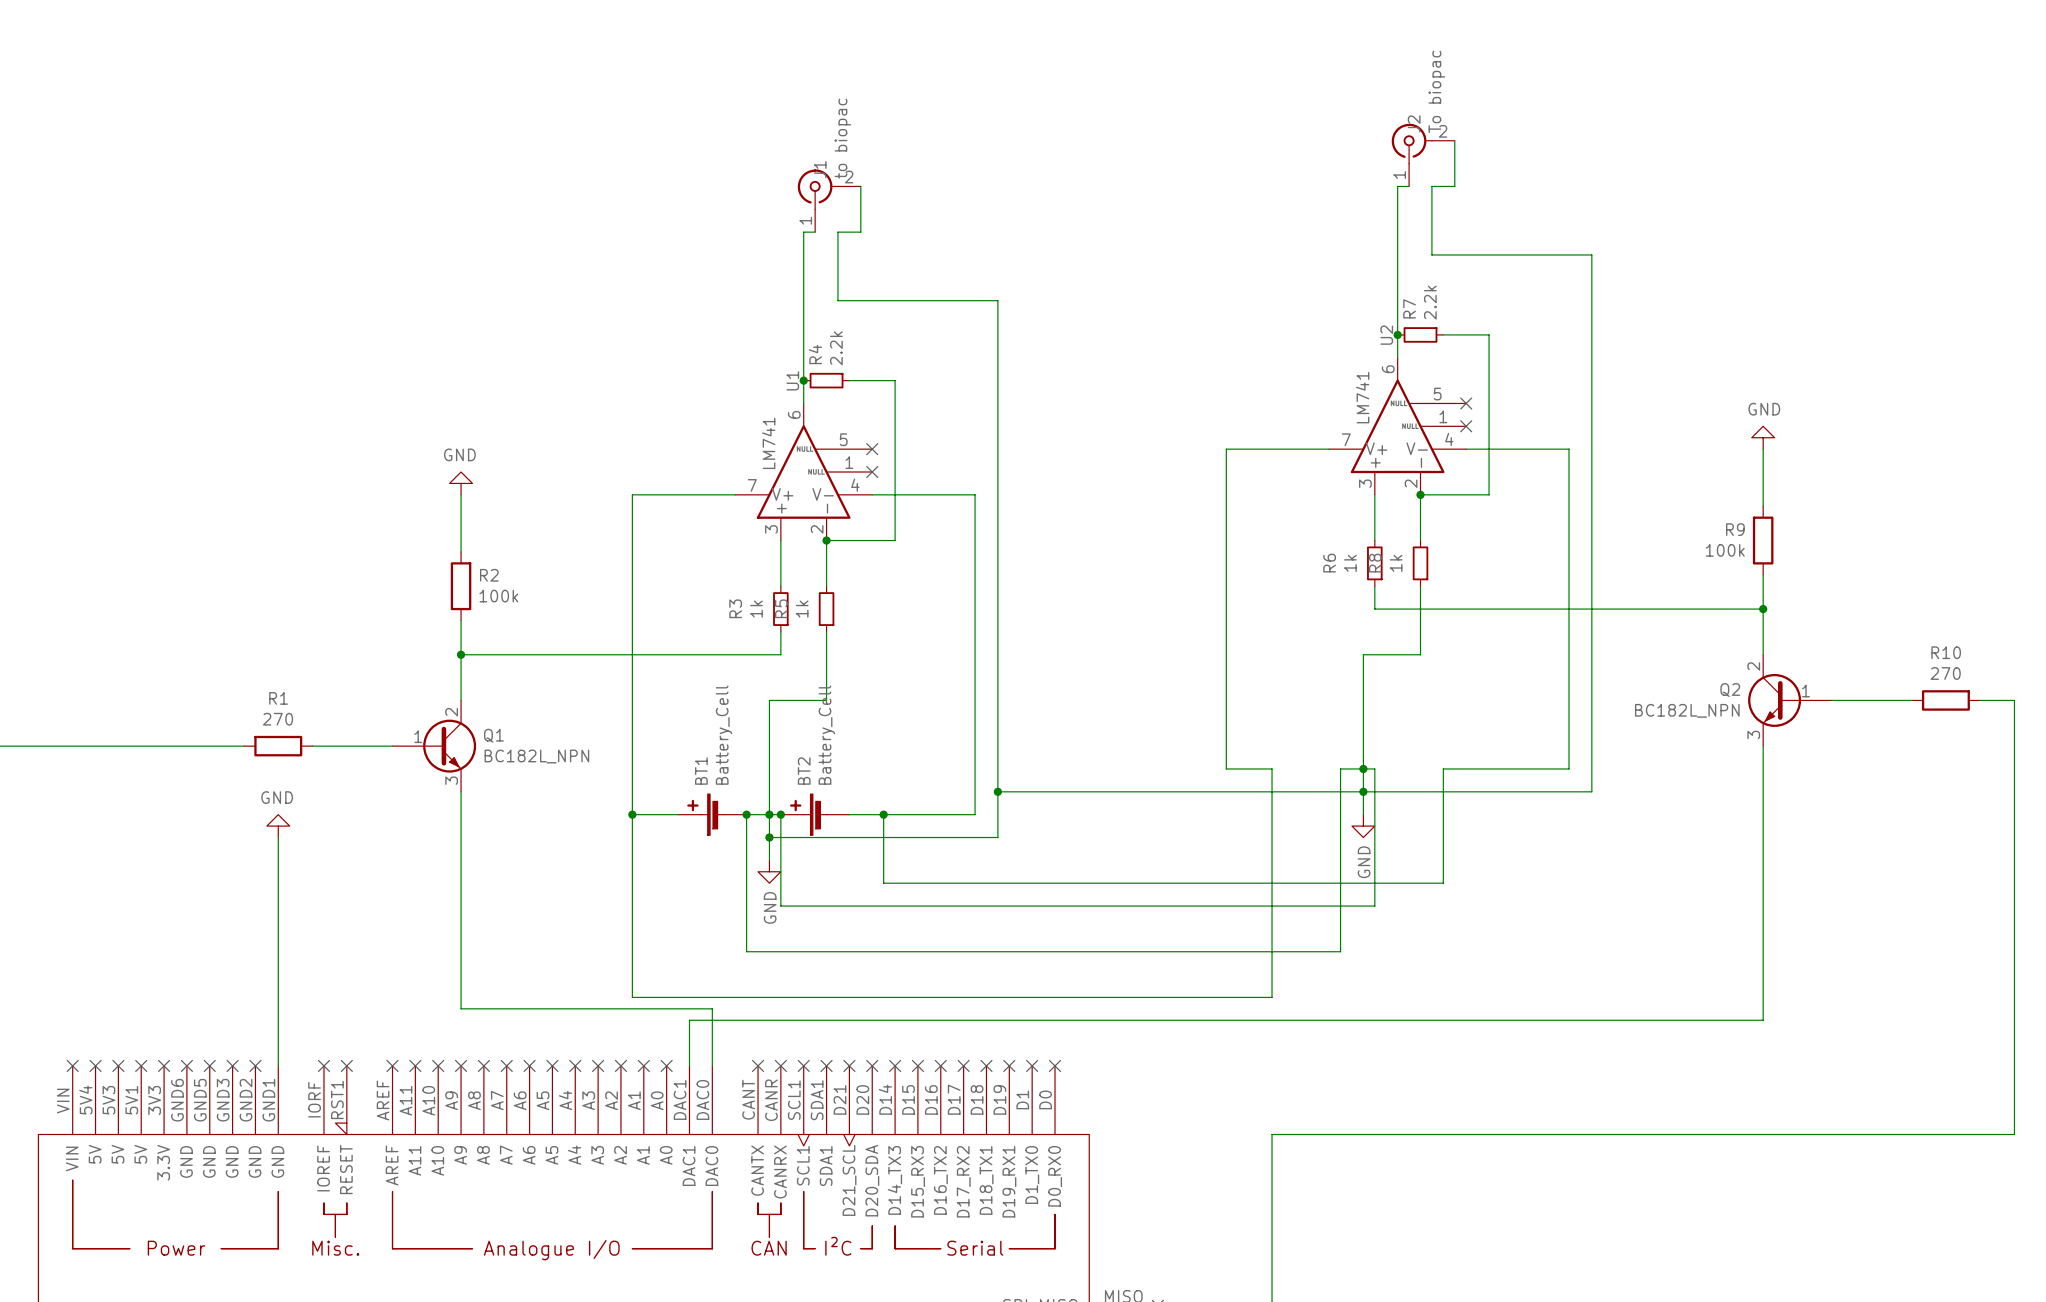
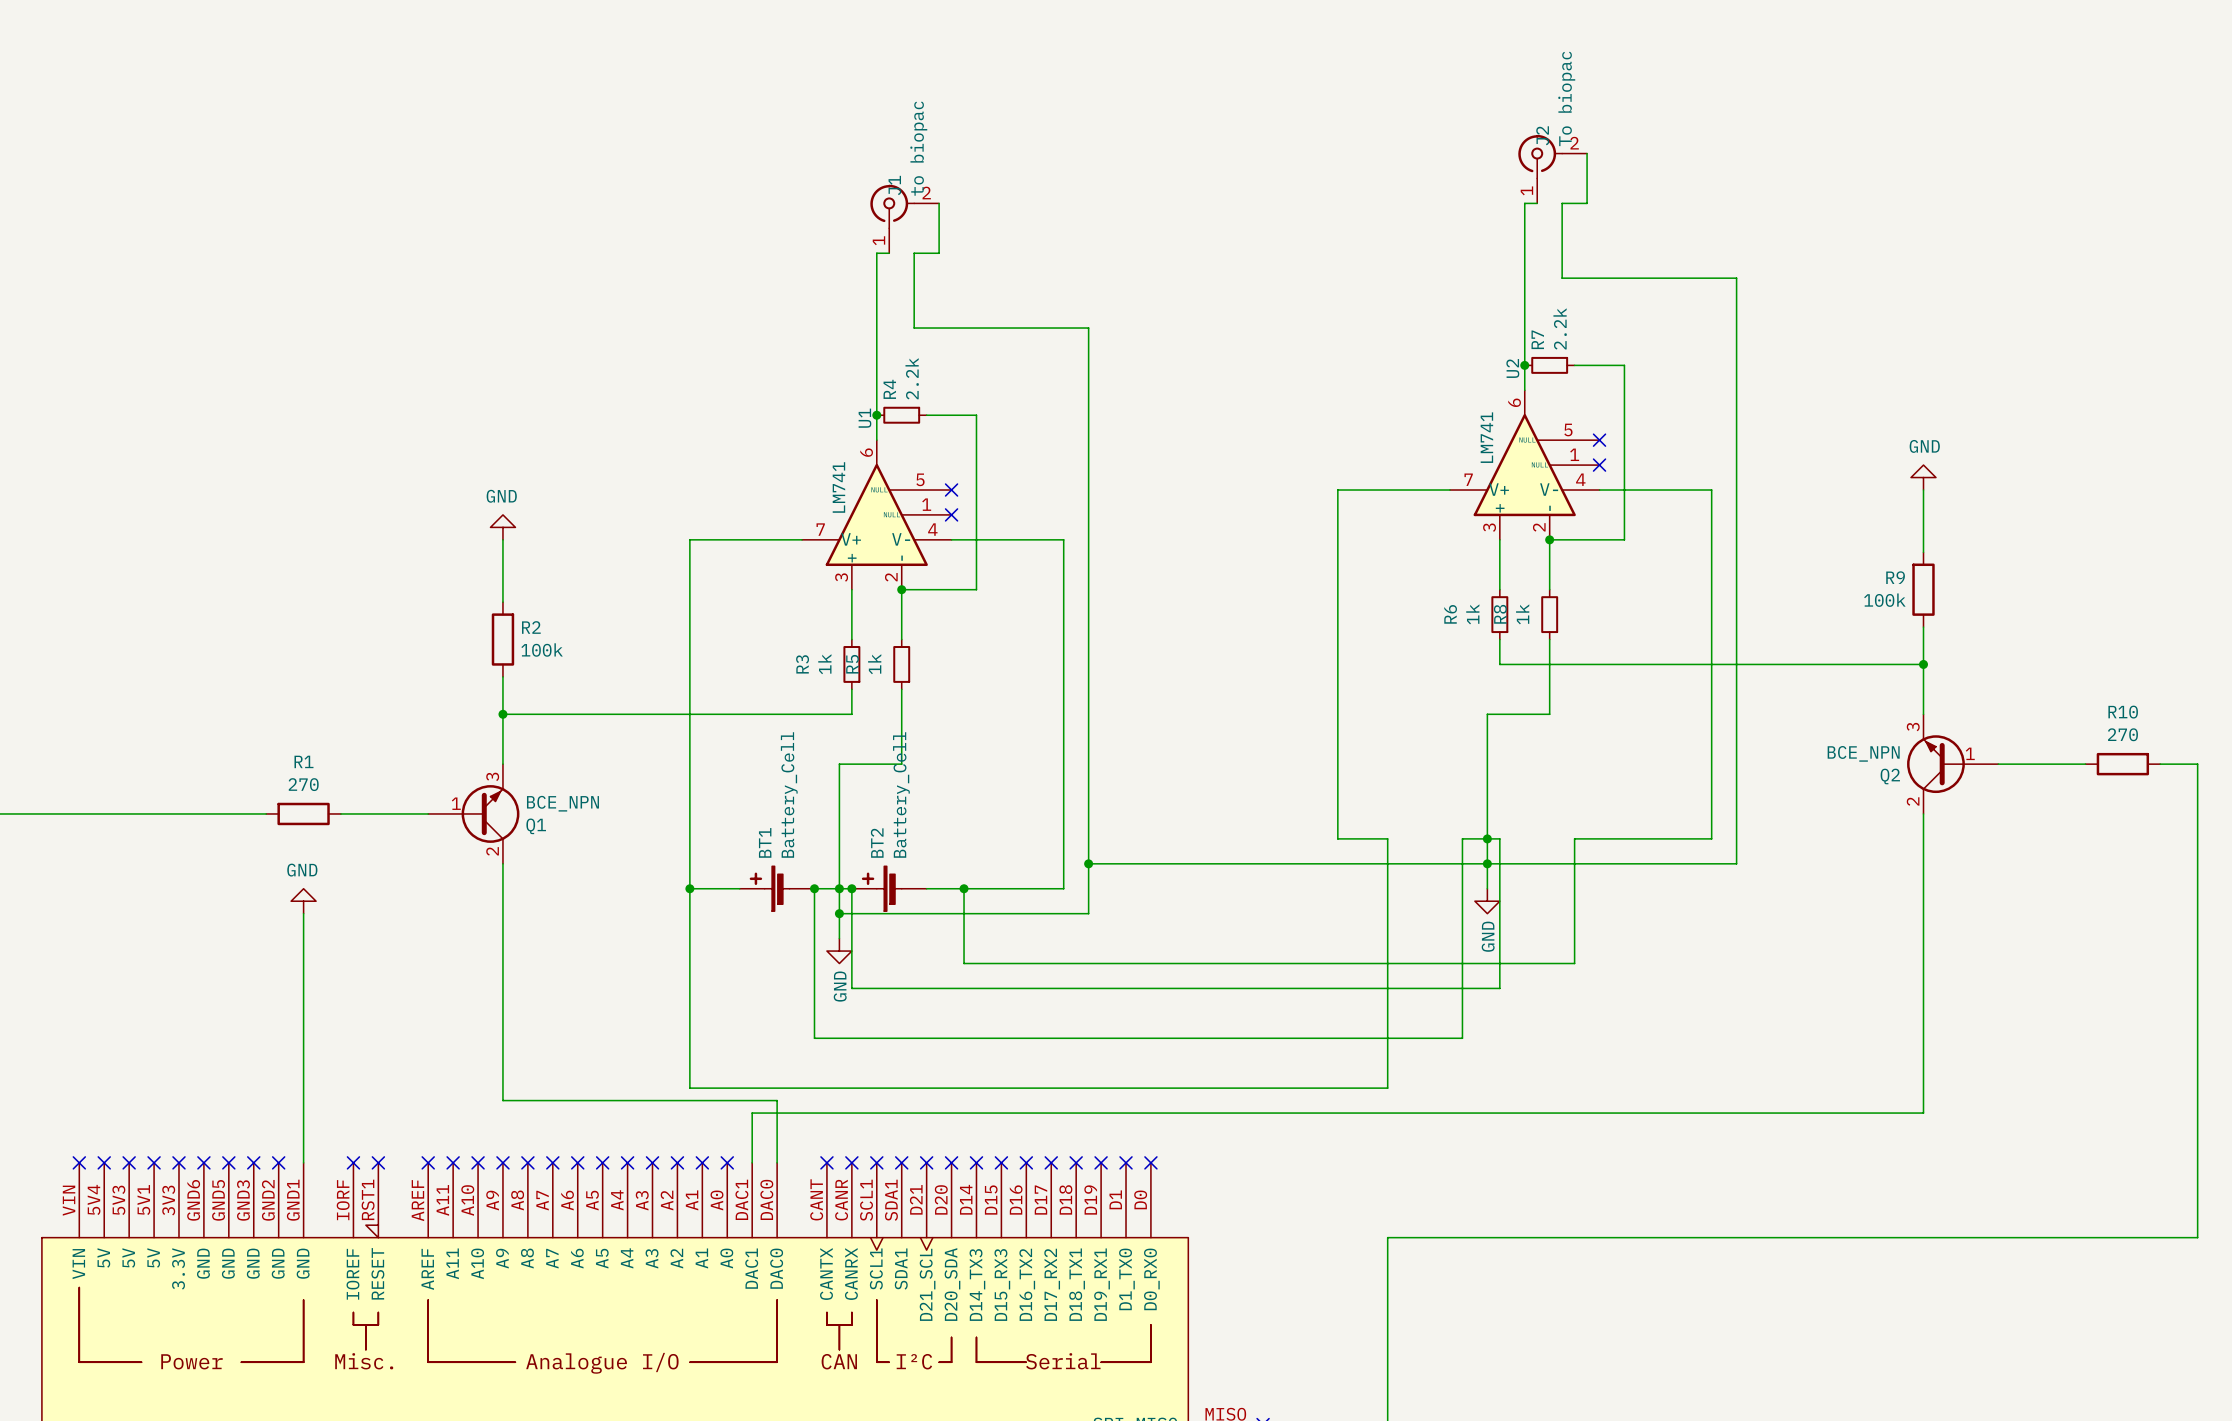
Q2 flip: as is (1774, 700) -> up-down (1935, 764)
Q2 value: BC182L_NPN (1687, 710) -> BCE_NPN (1863, 753)
Q1 flip: as is (449, 746) -> up-down (490, 813)
Q1 value: BC182L_NPN (536, 756) -> BCE_NPN (562, 803)

